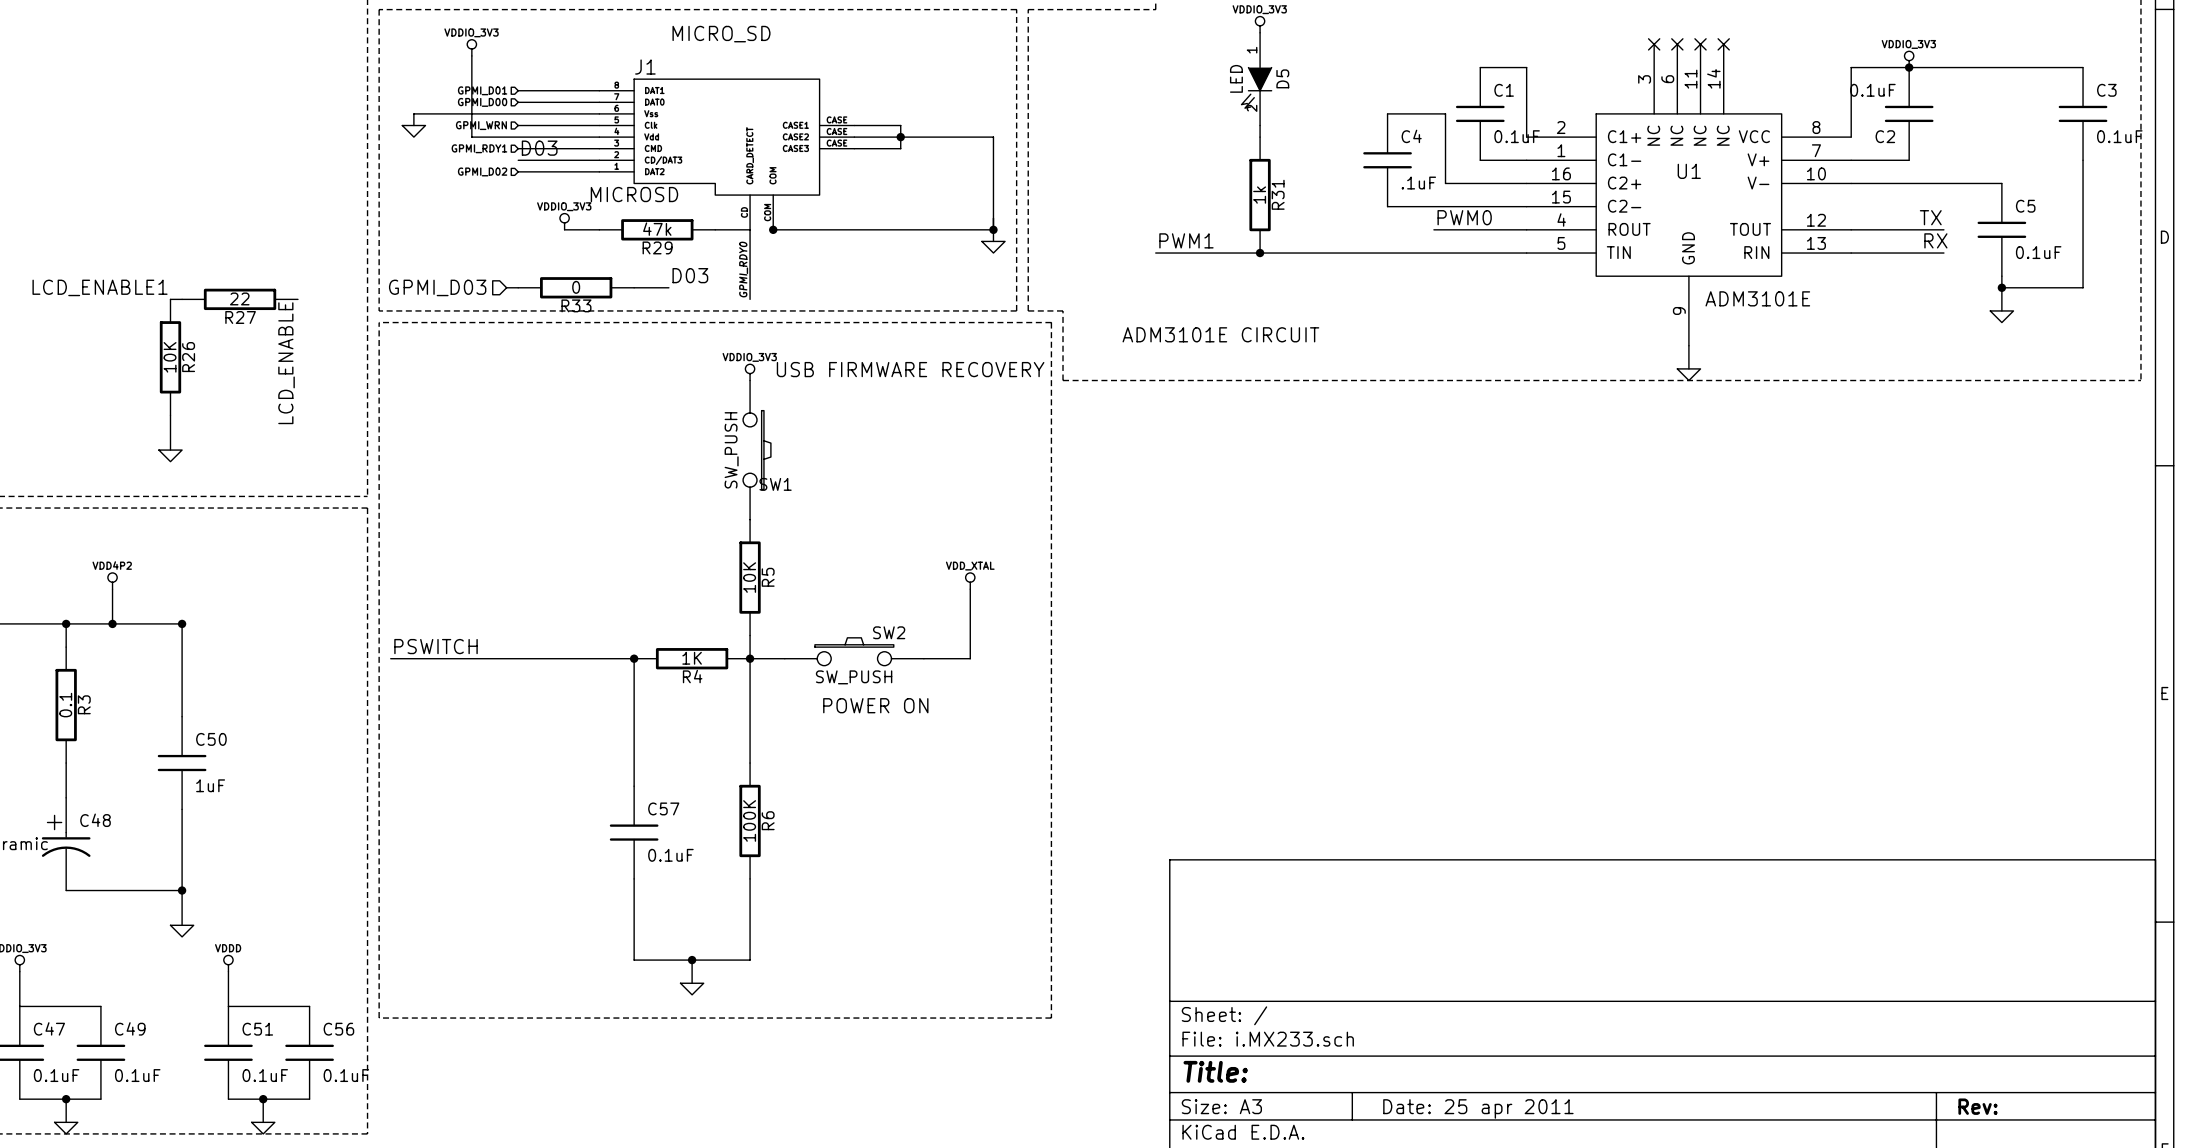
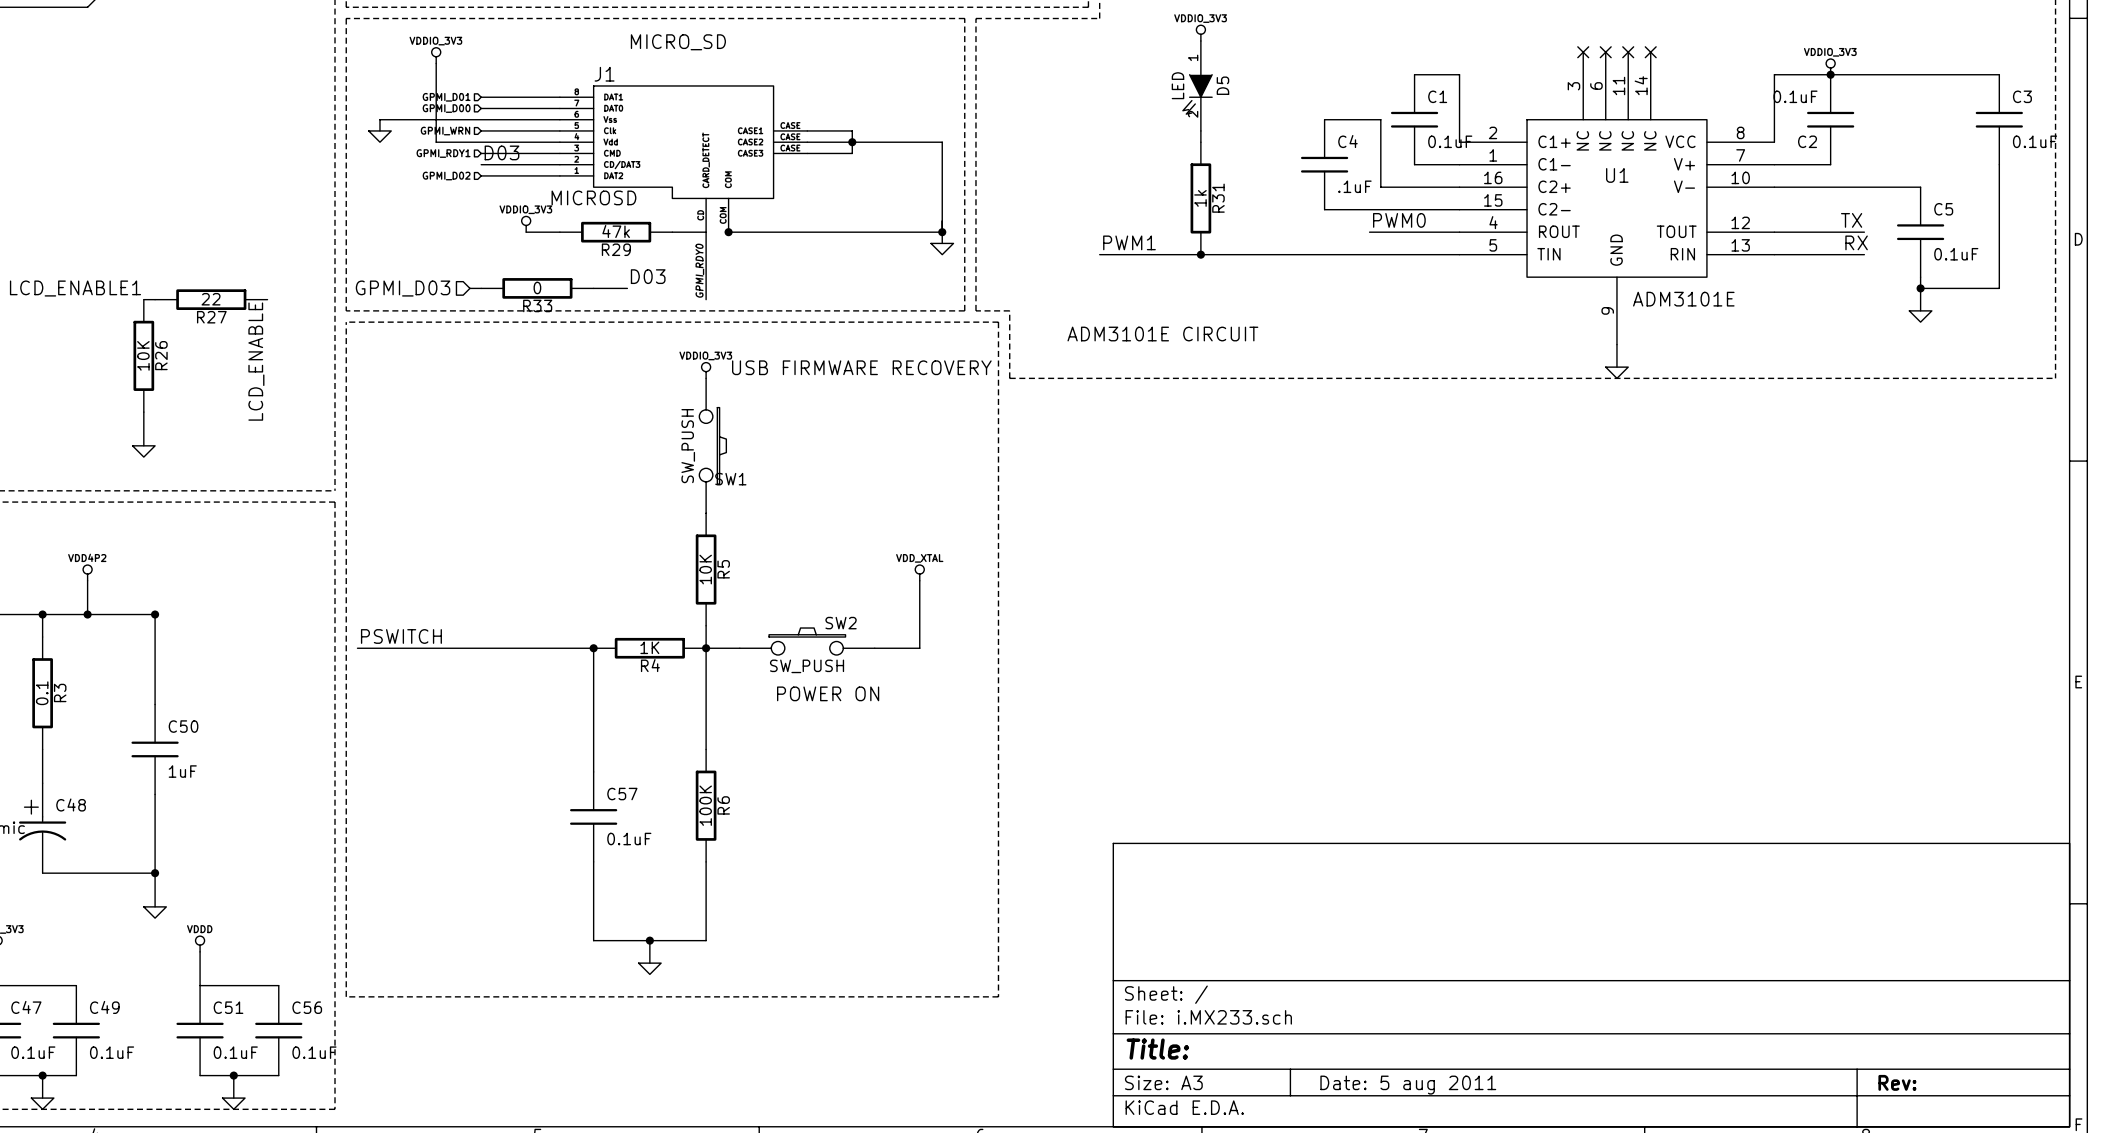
title block: Date: 25 apr 2011 (1478, 1108) -> Date: 5 aug 2011 (1408, 1085)

